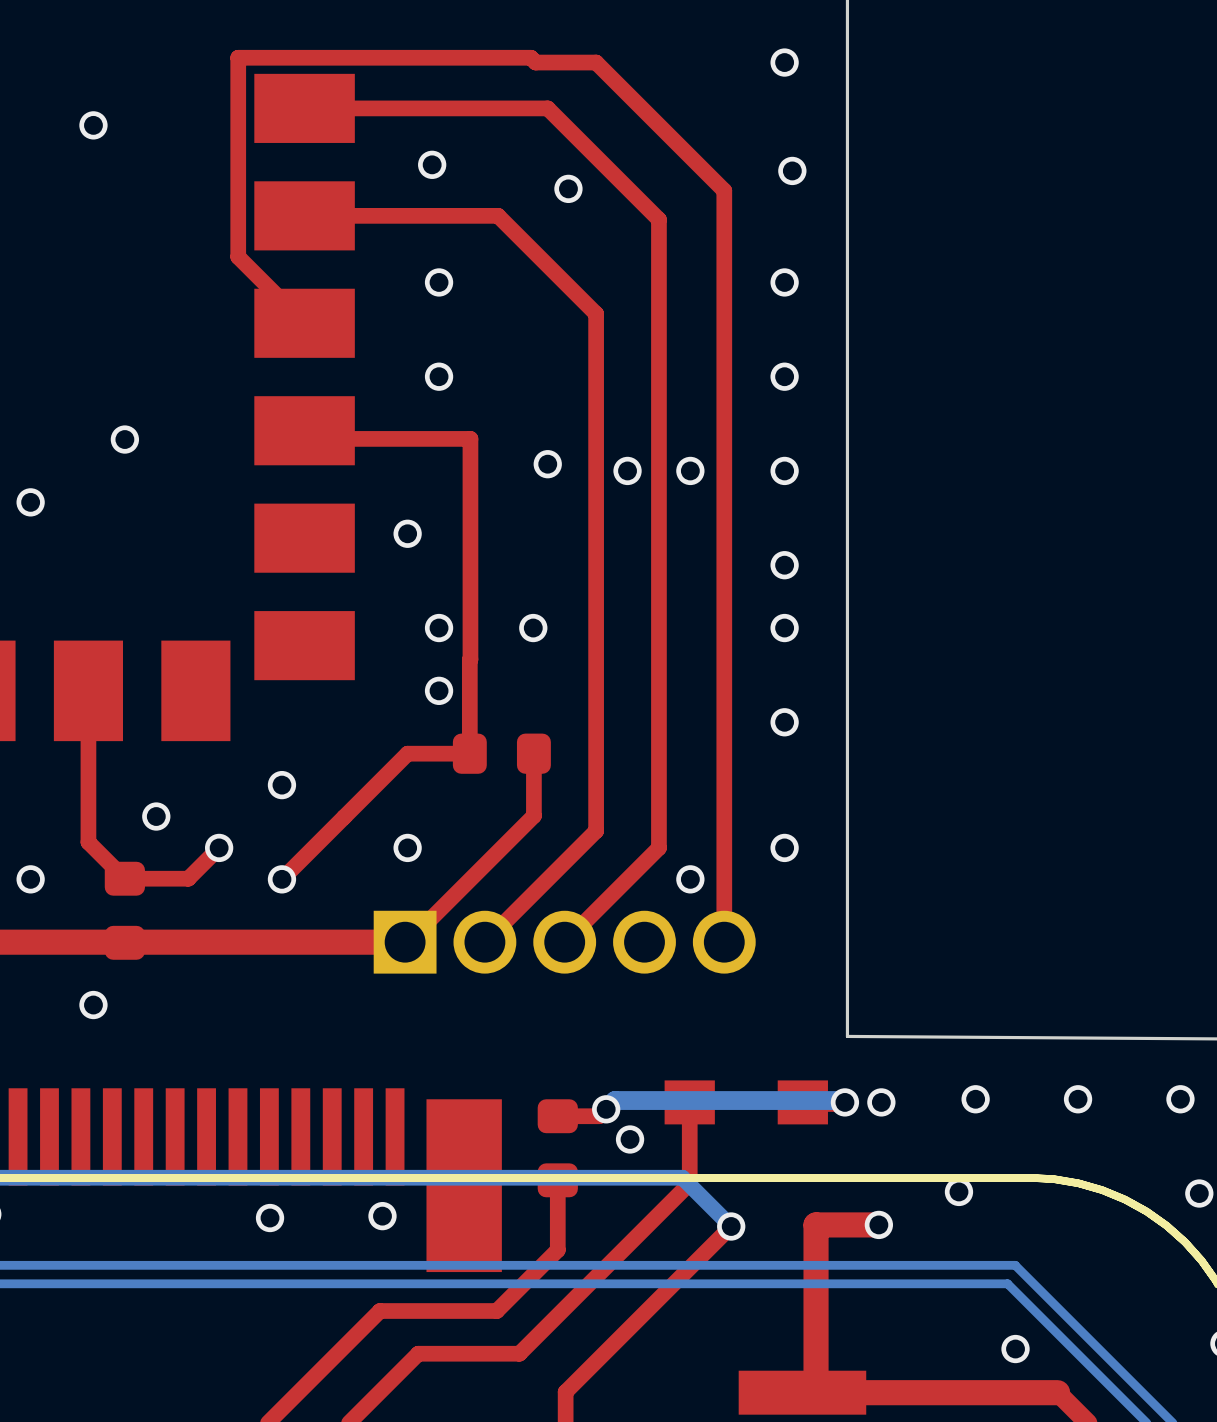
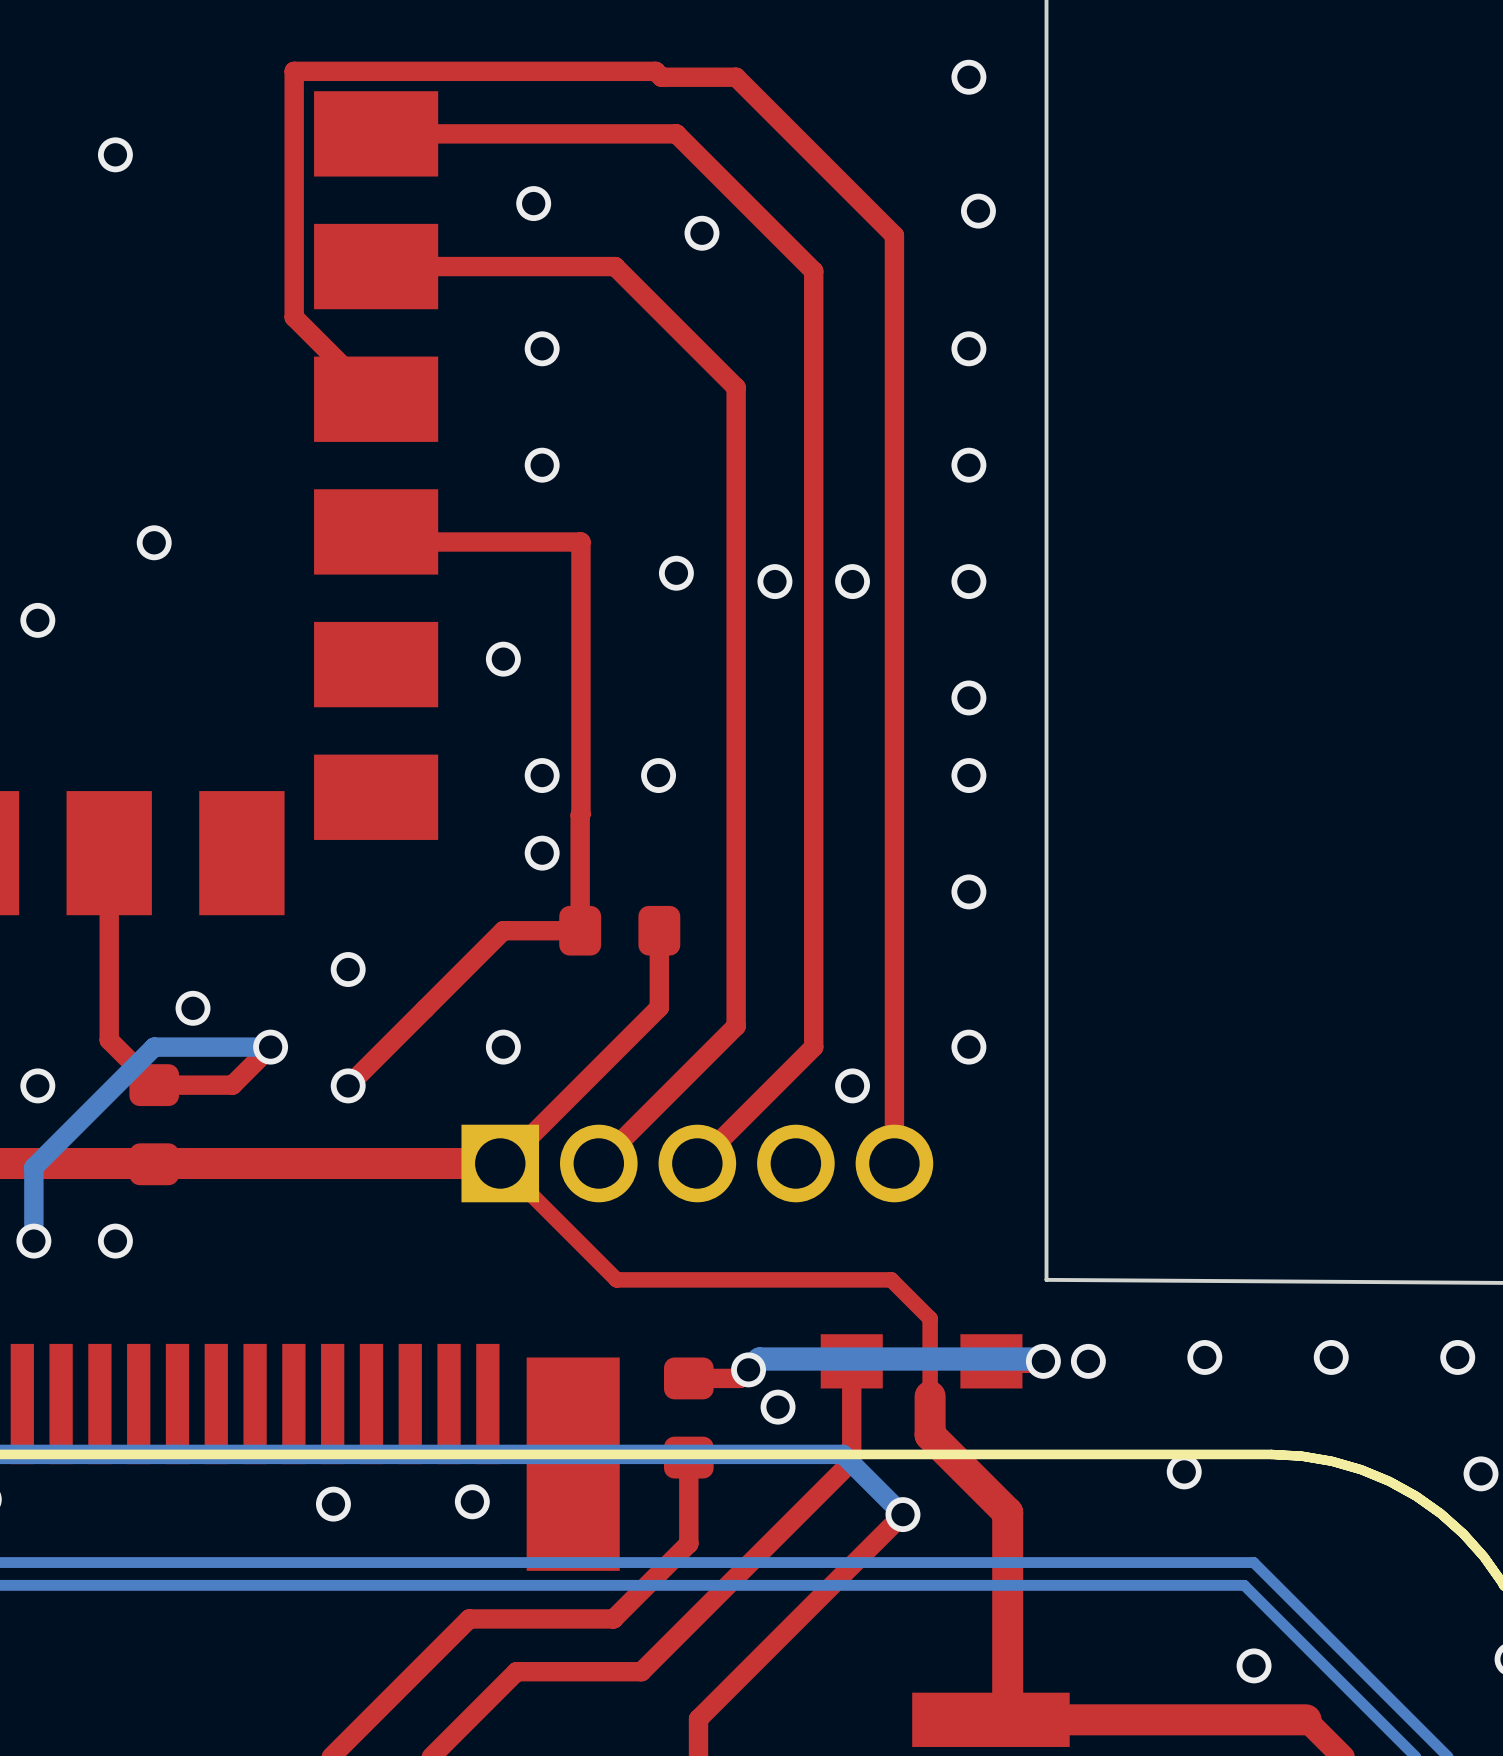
bottom track: none -> (270, 1047) (154, 1047) (33, 1167) (33, 1241)
via: none -> (33, 1241)
top track: (878, 1224) (816, 1224) -> (500, 1163) (616, 1279) (891, 1279) (930, 1318) (930, 1435) (1007, 1512)
via: (878, 1224) -> none

